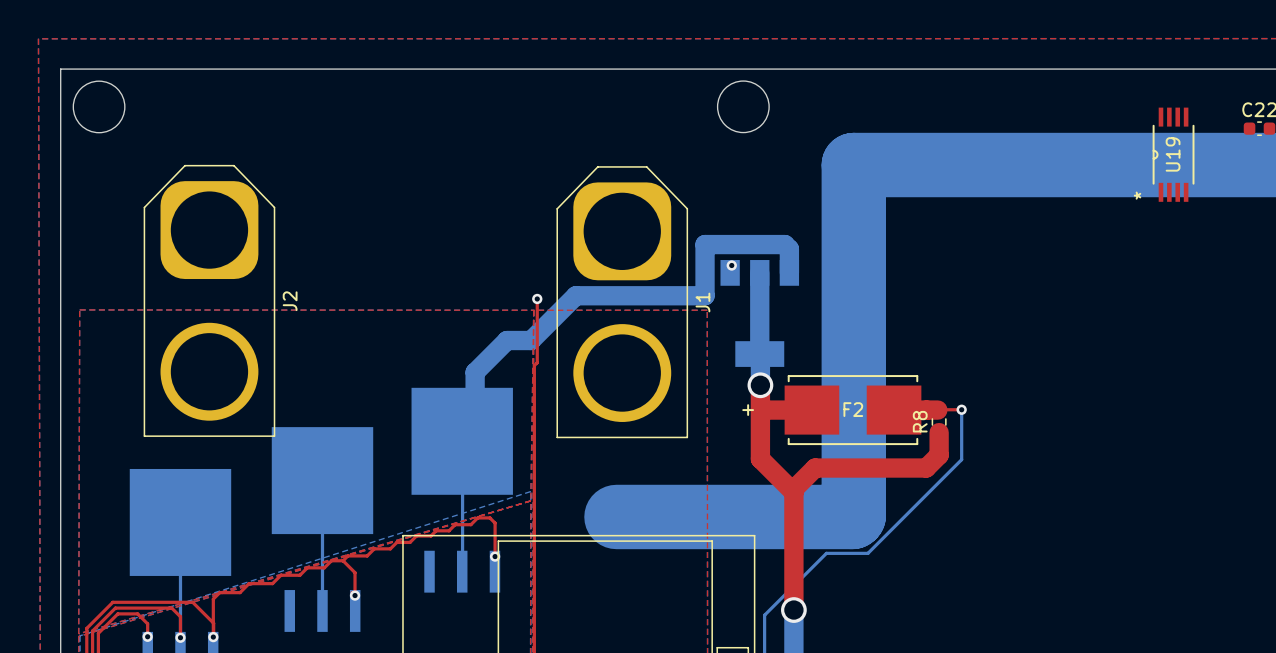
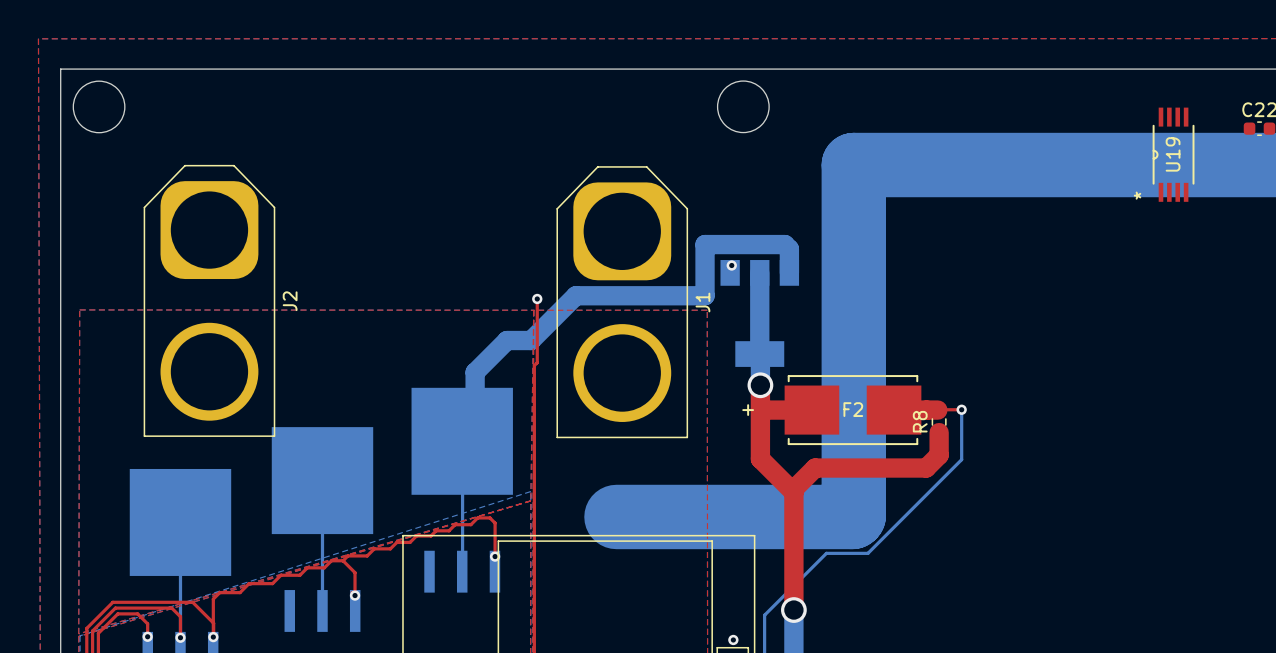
via: none -> (733, 639)

